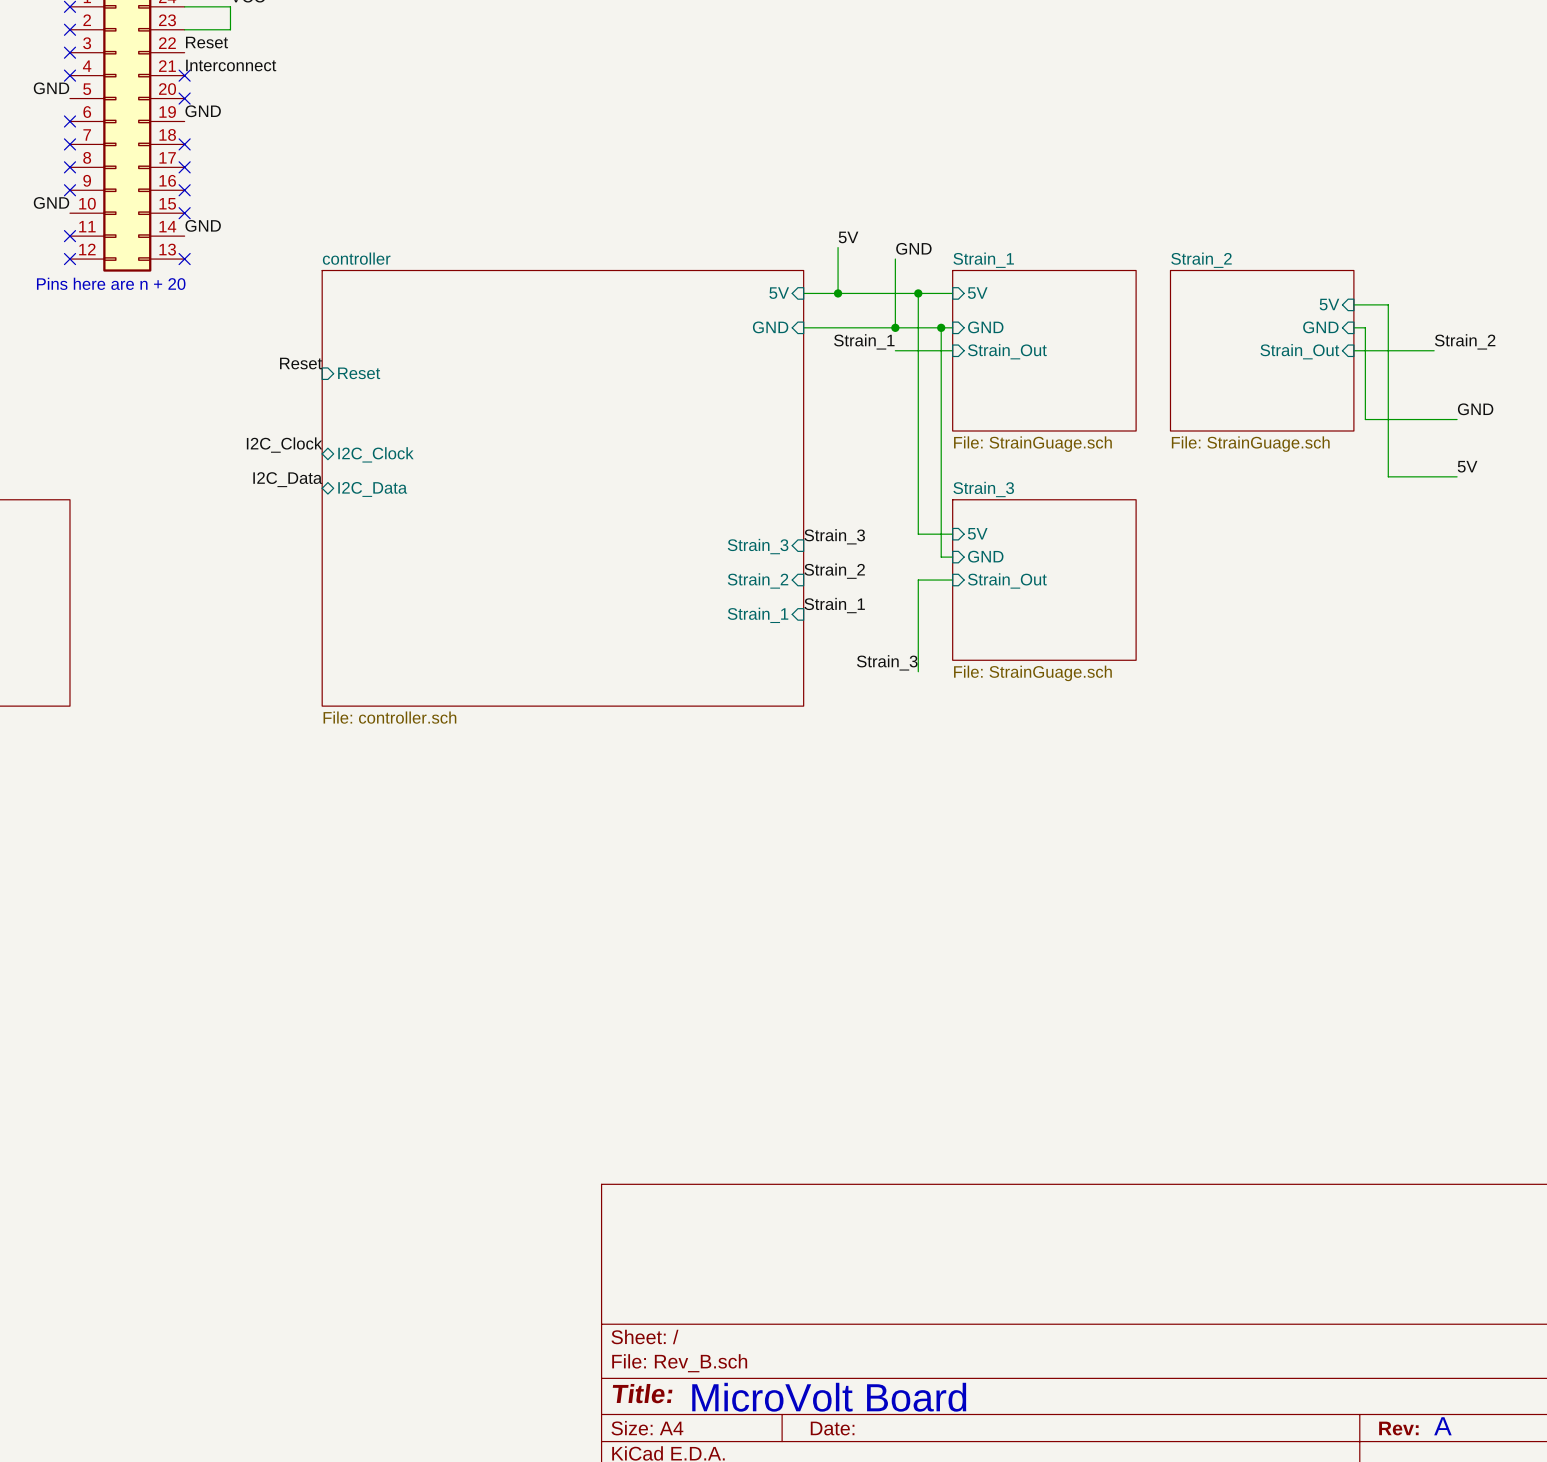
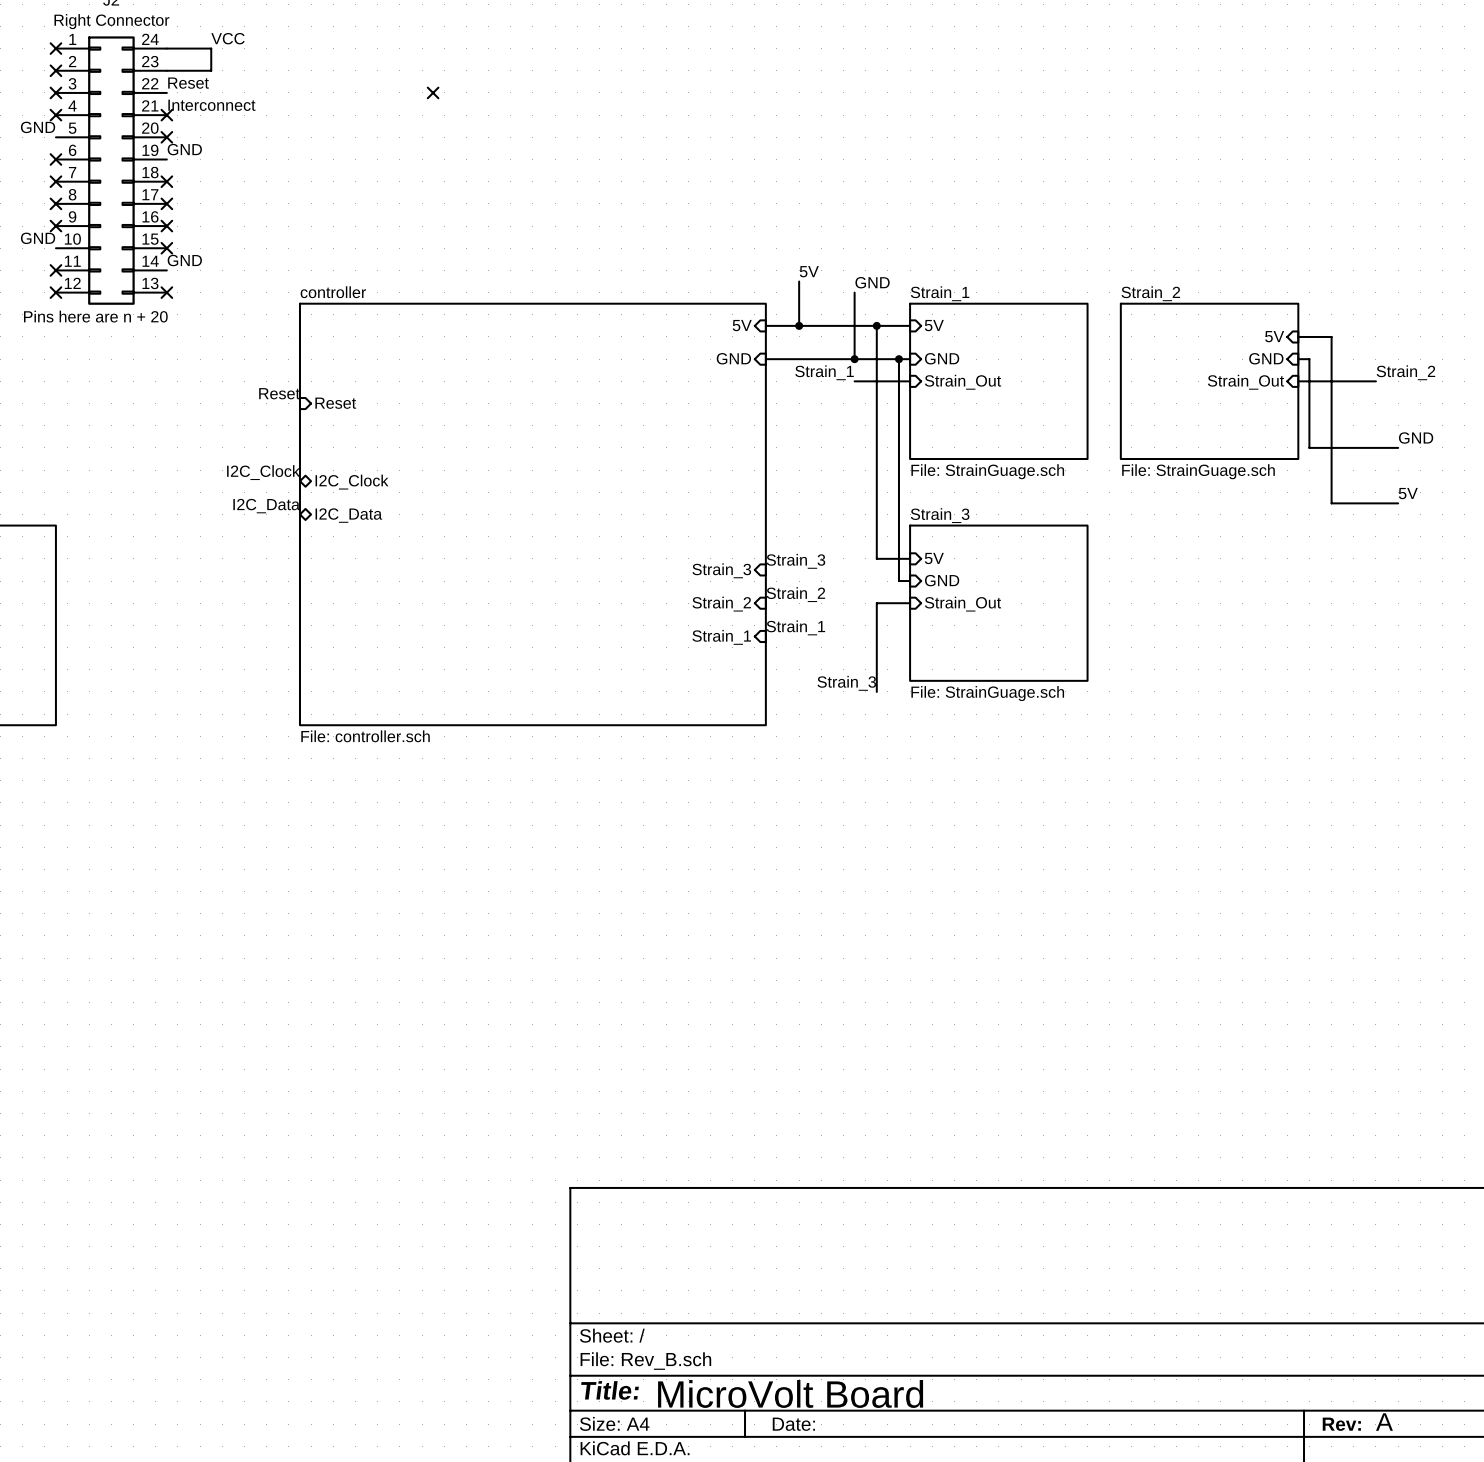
no-connect mark: none -> (433, 92)

